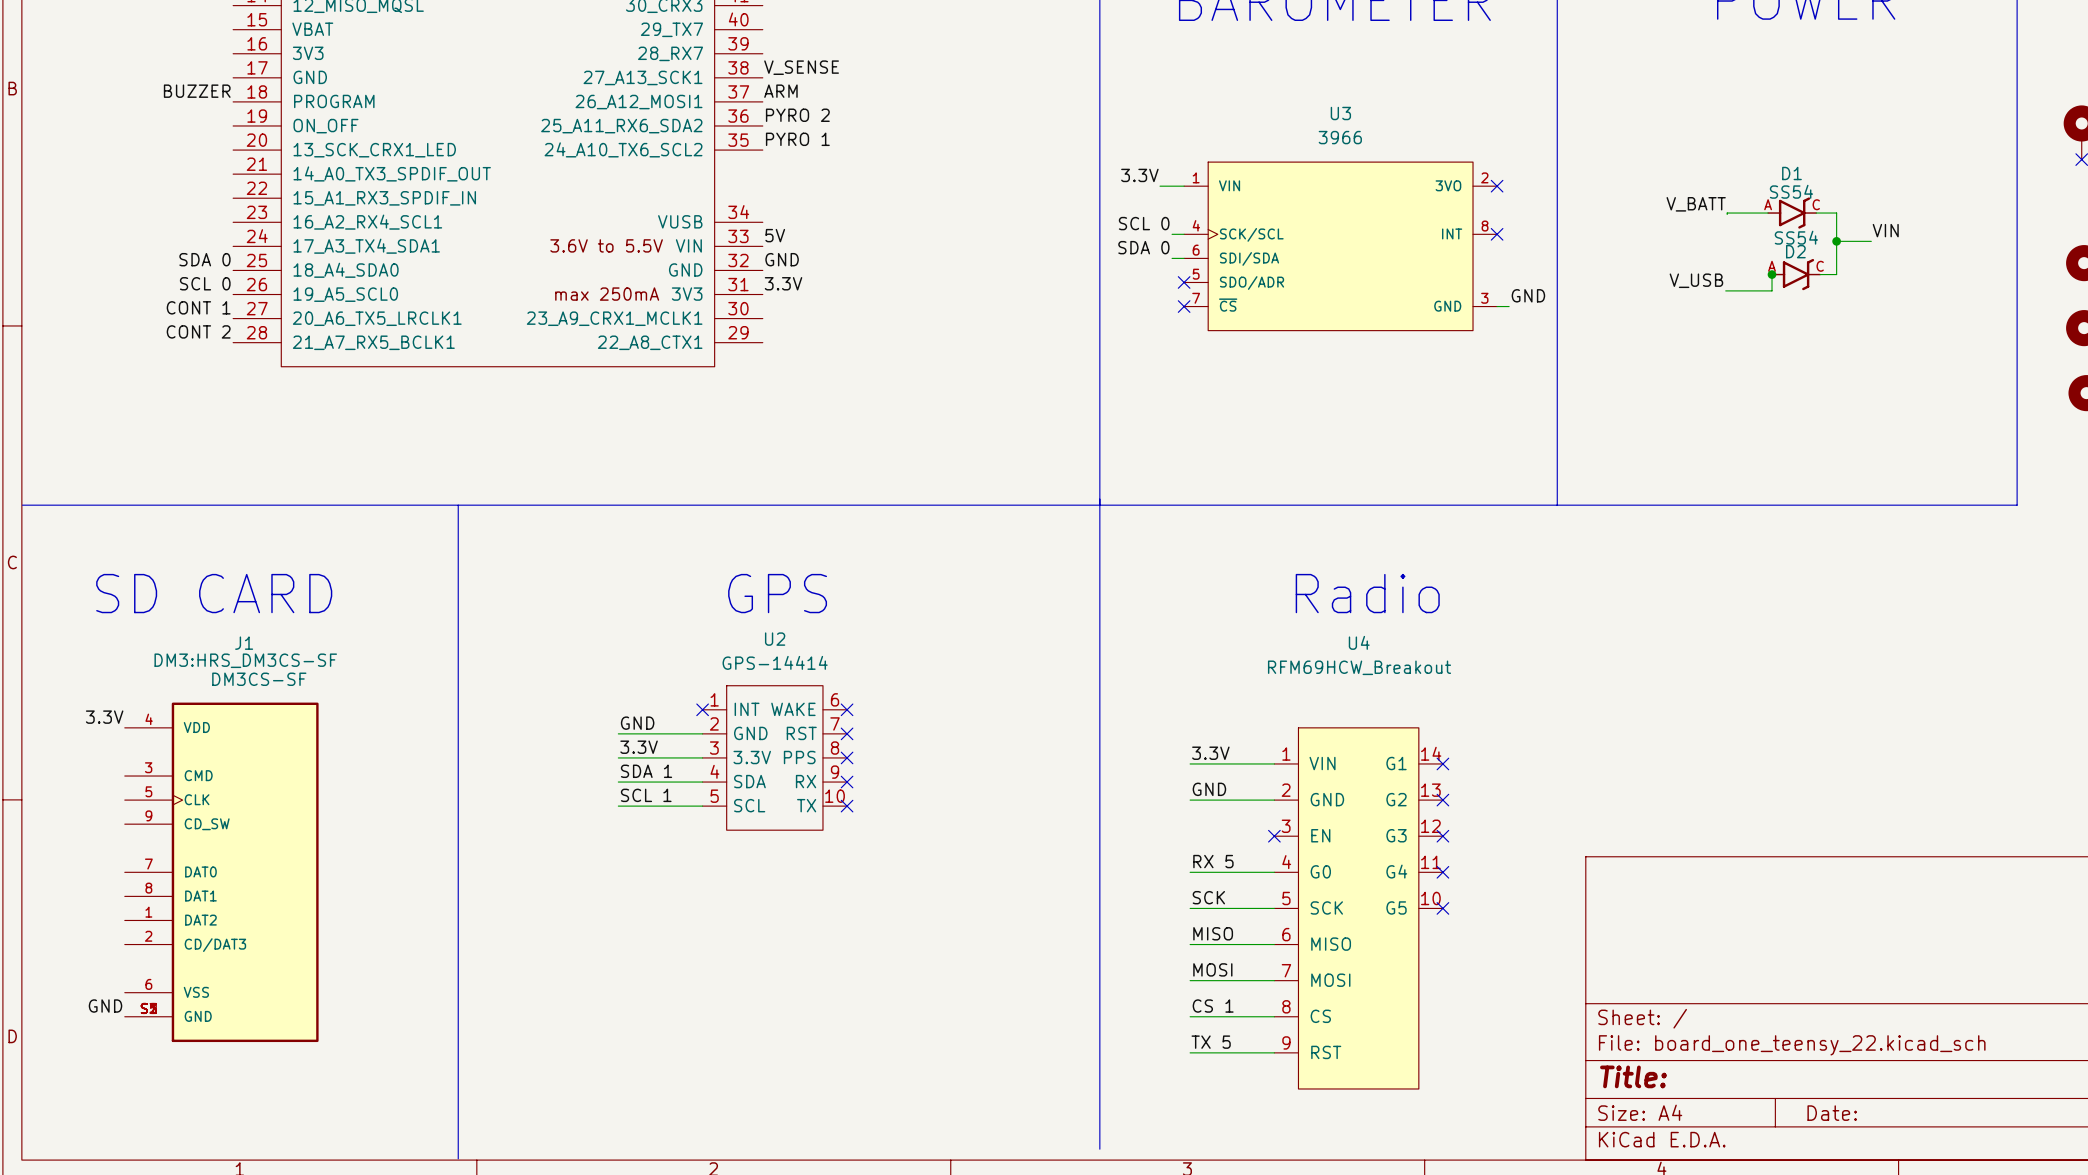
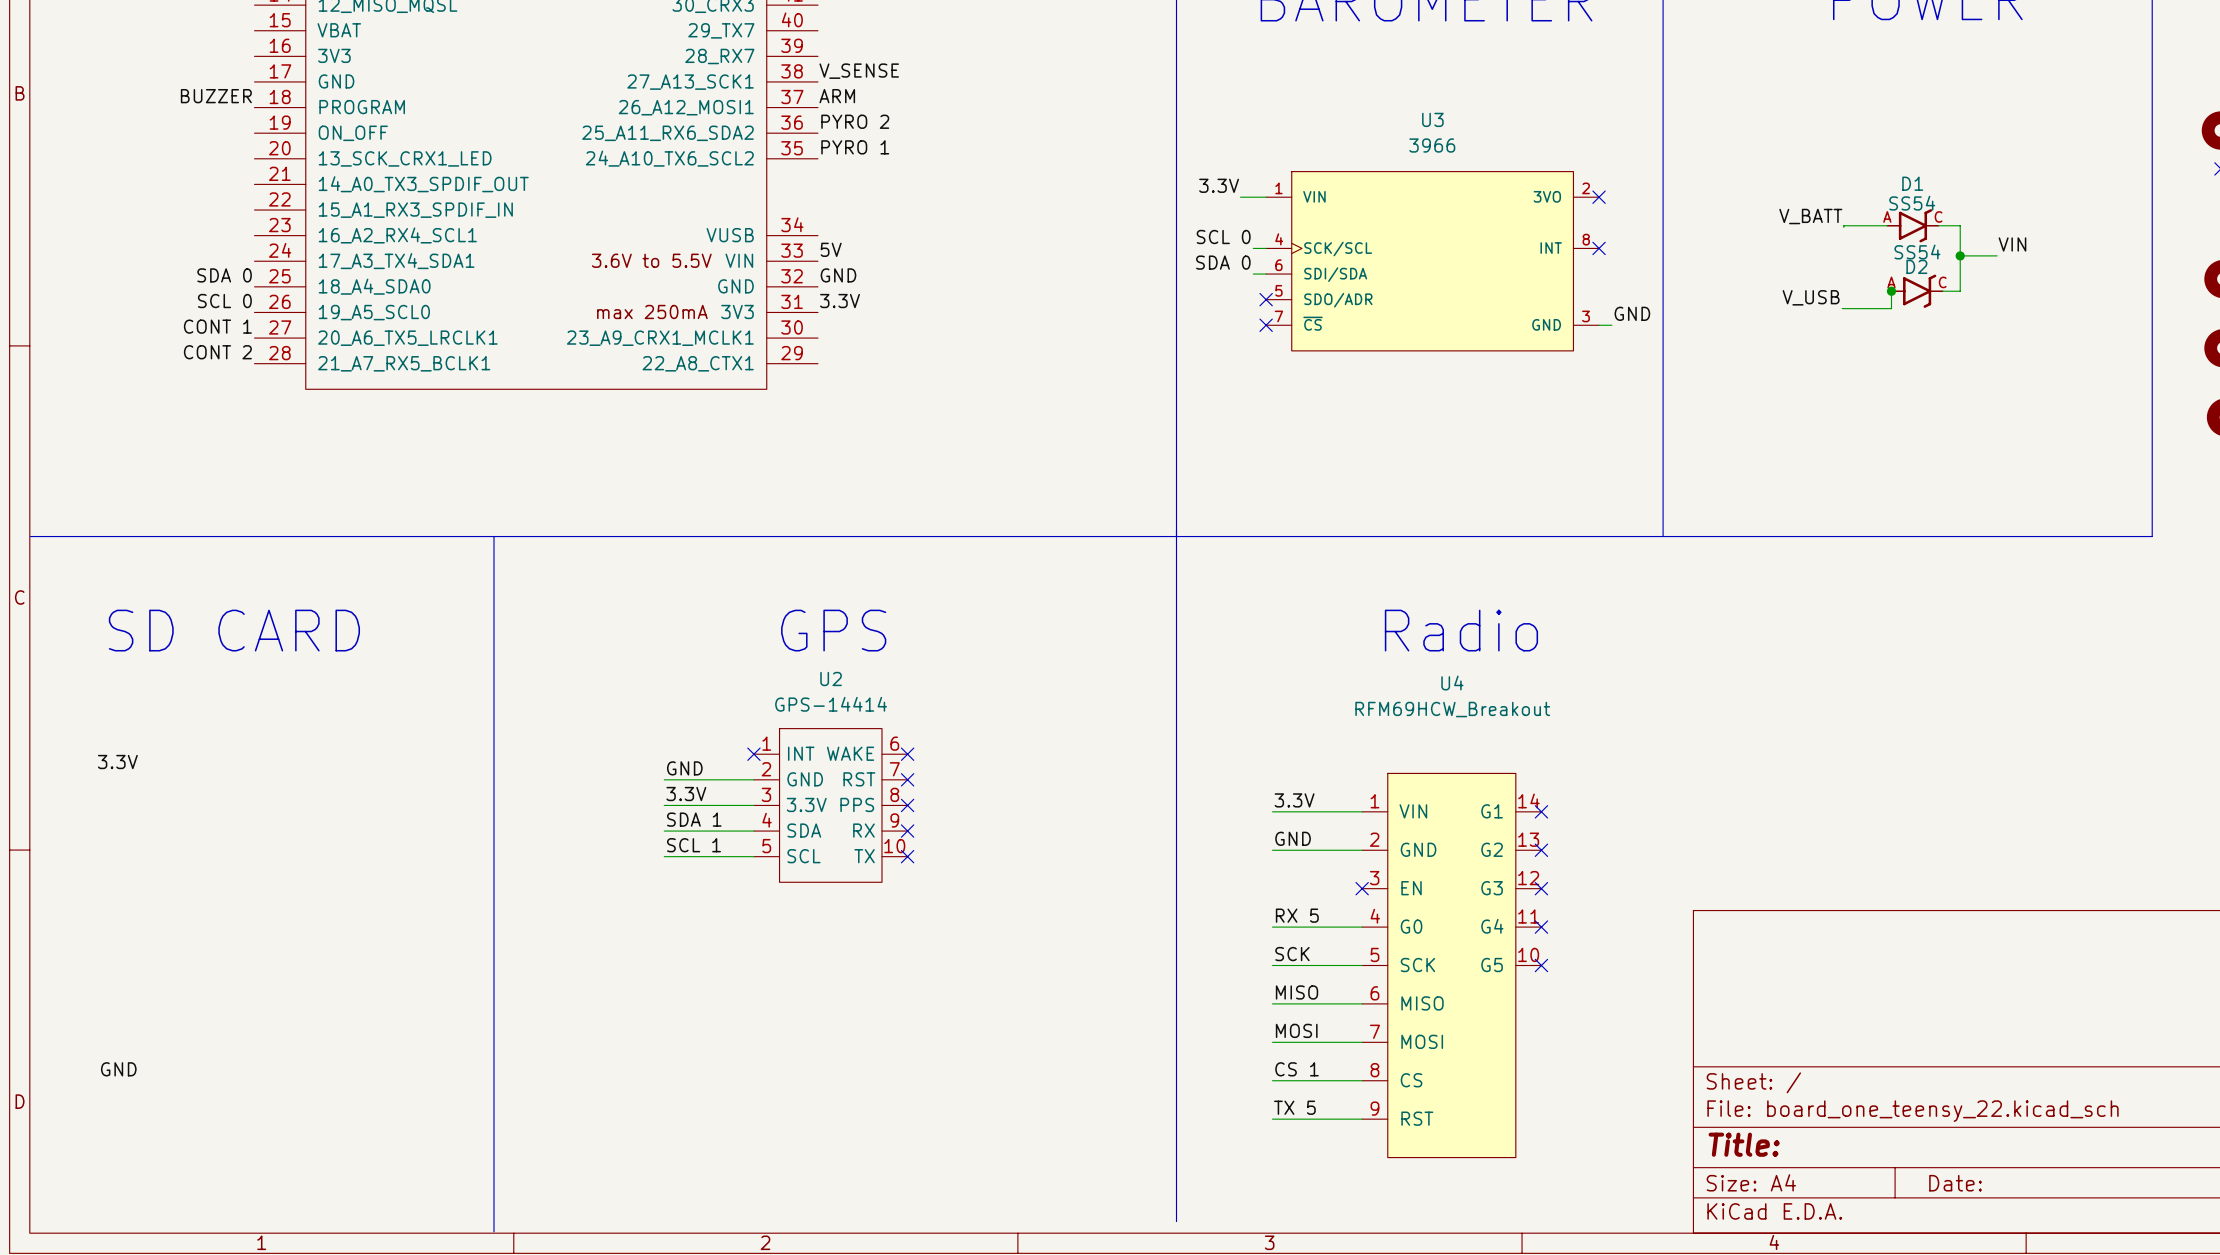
J1: DM3CS-SF (221, 872) -> none

